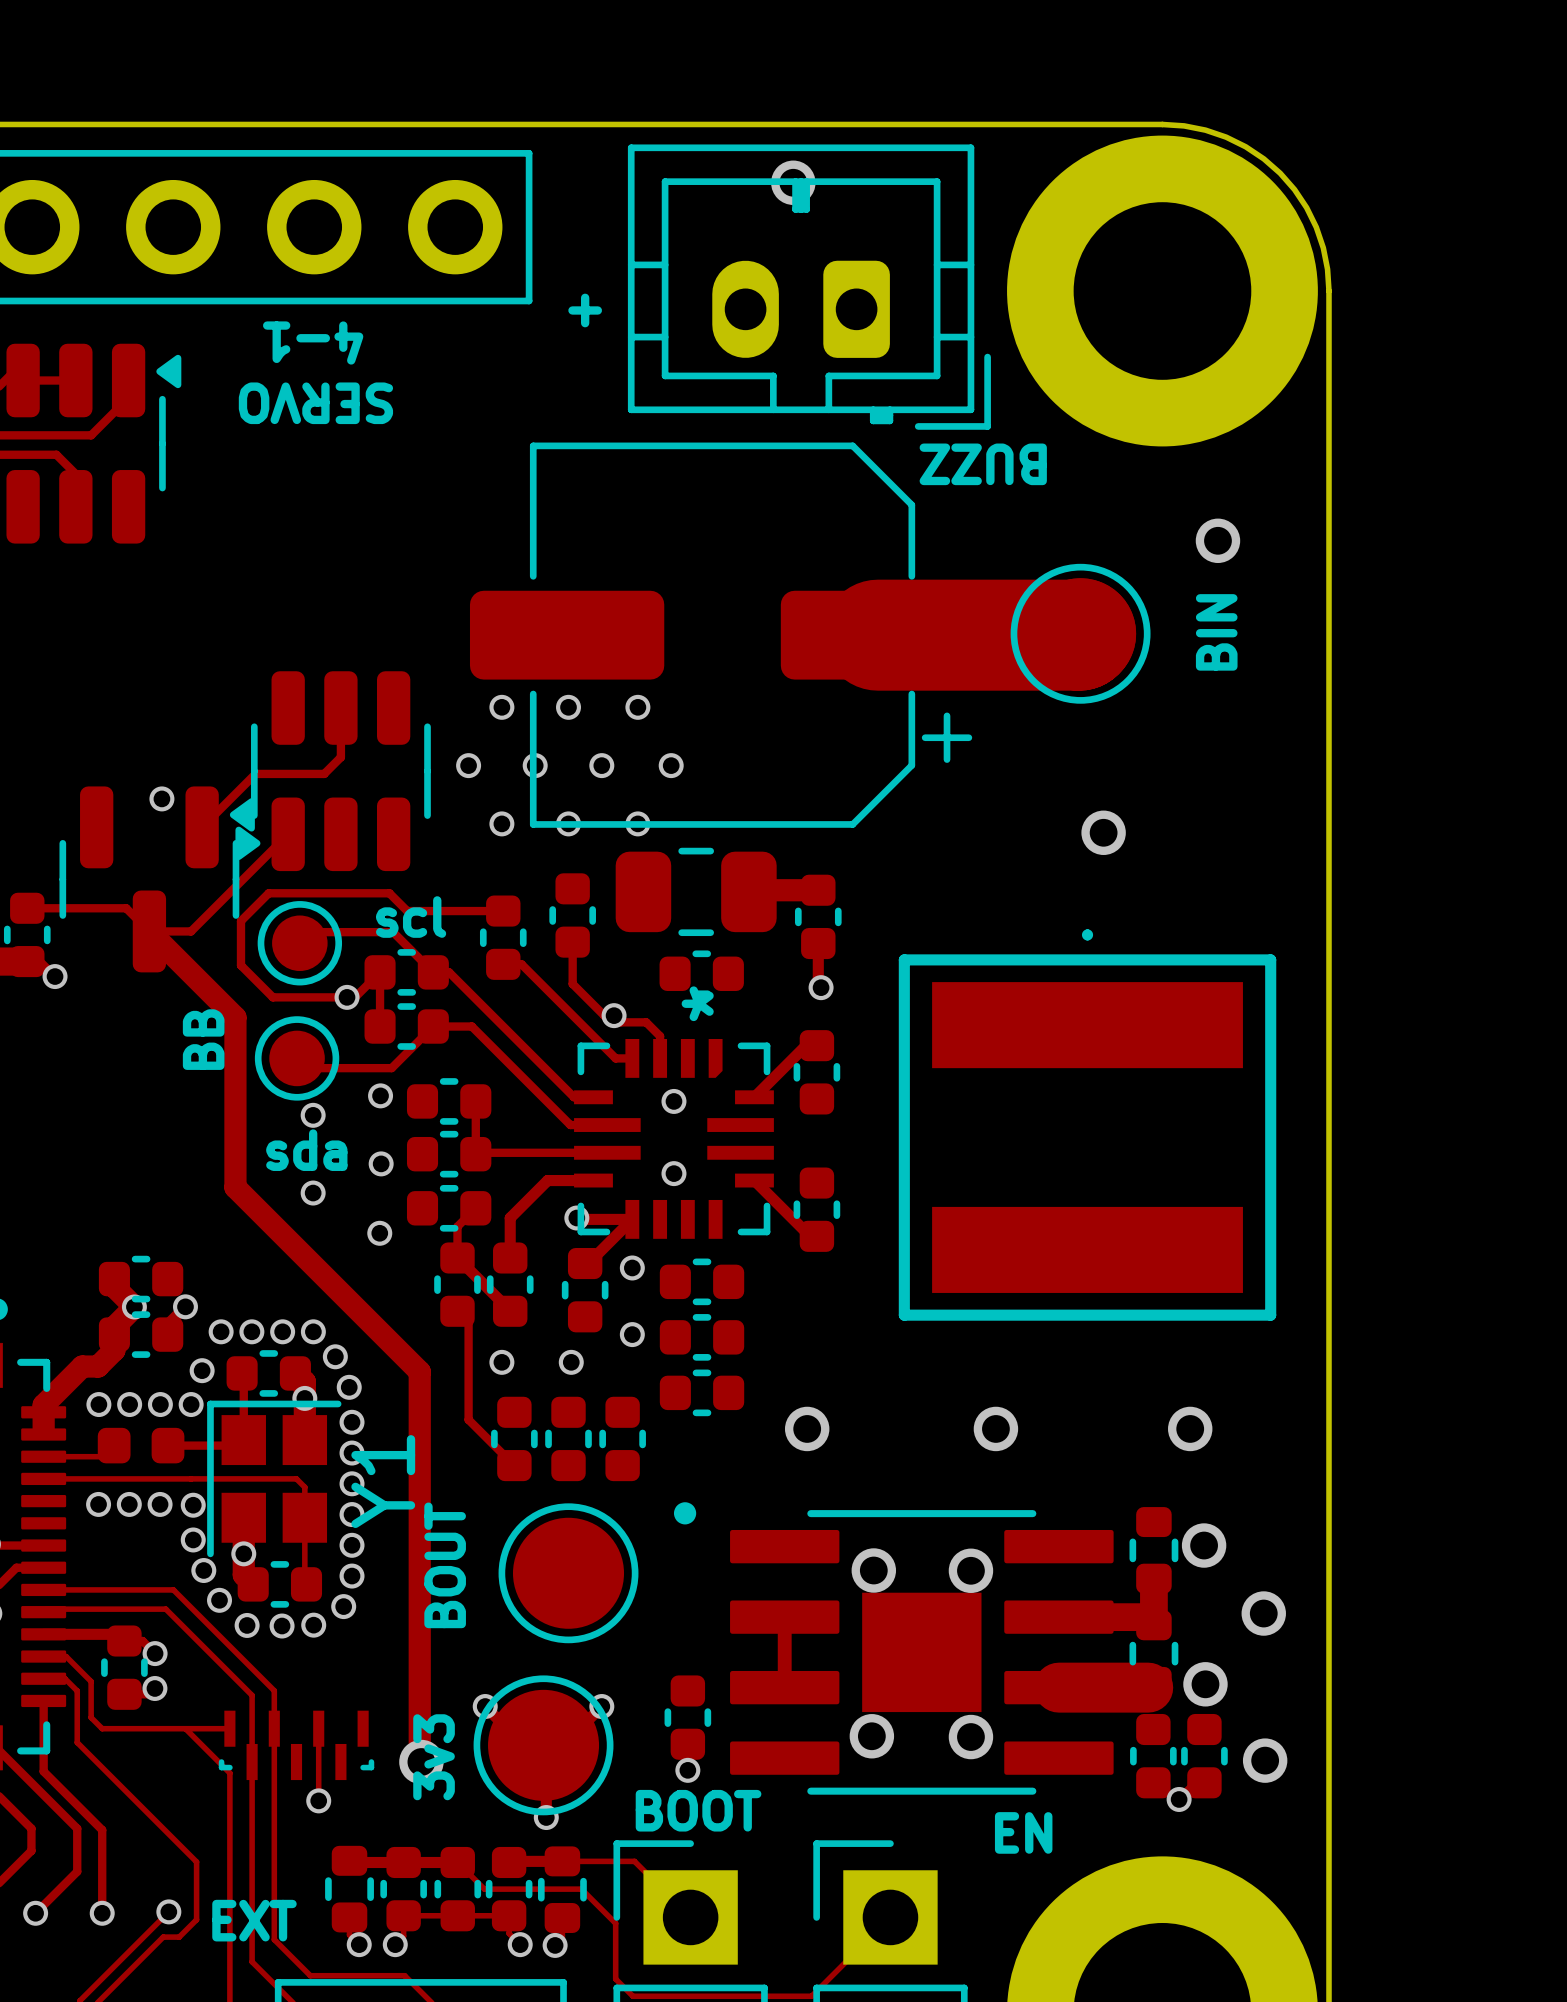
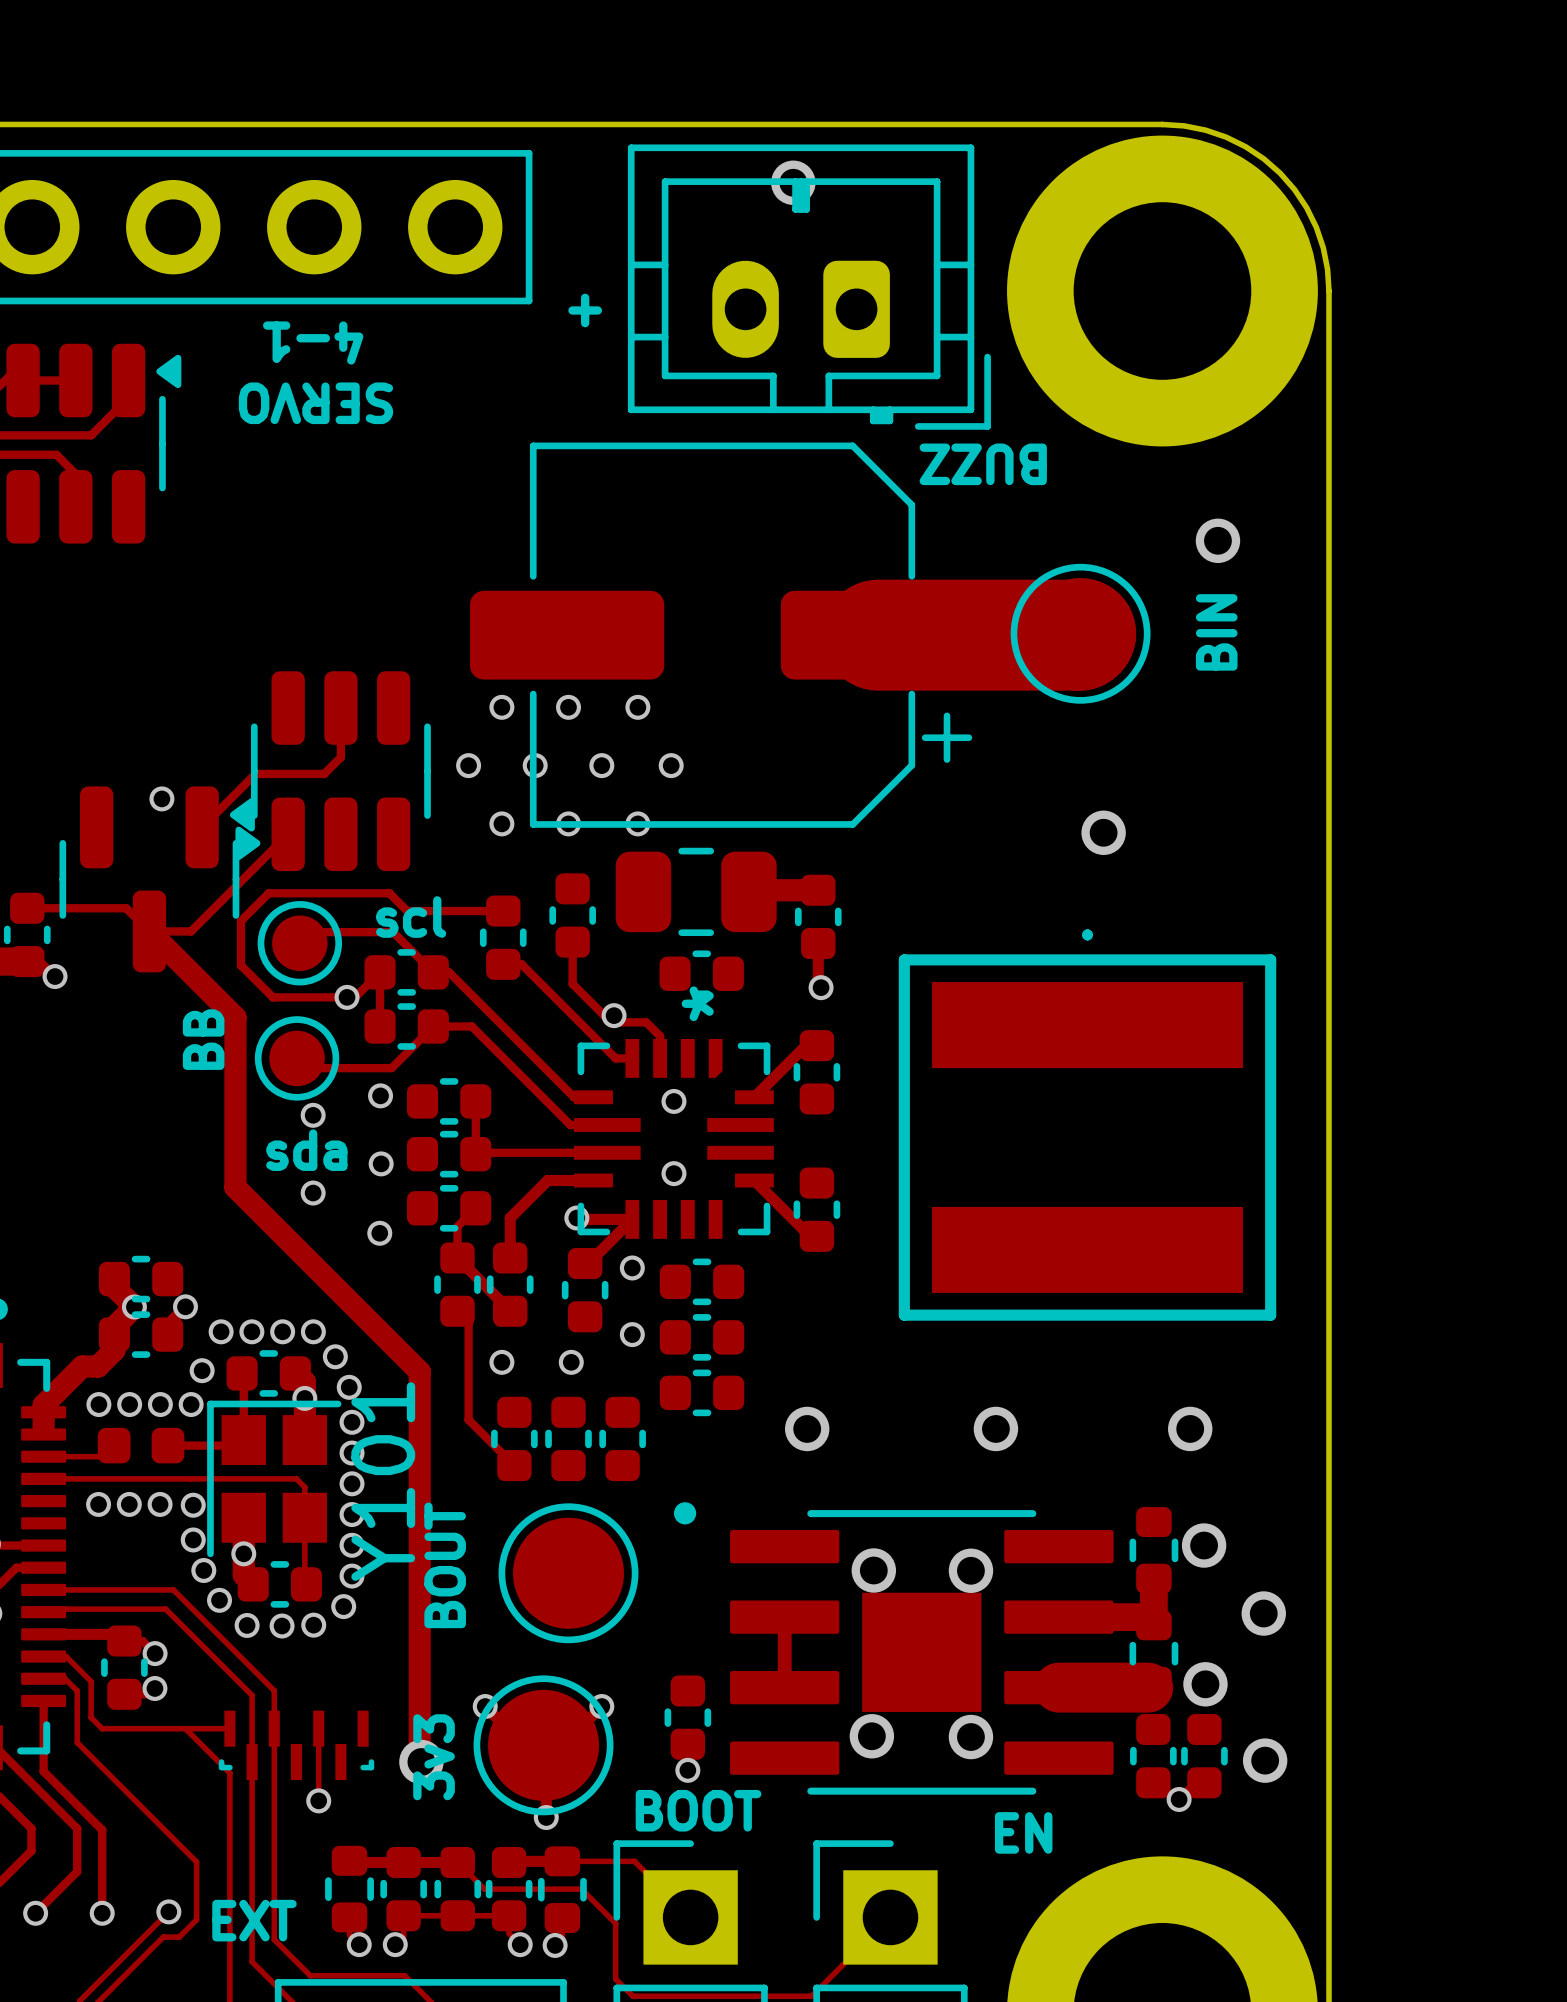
Y1 name: Y1 (383, 1481) -> Y101 (383, 1481)

